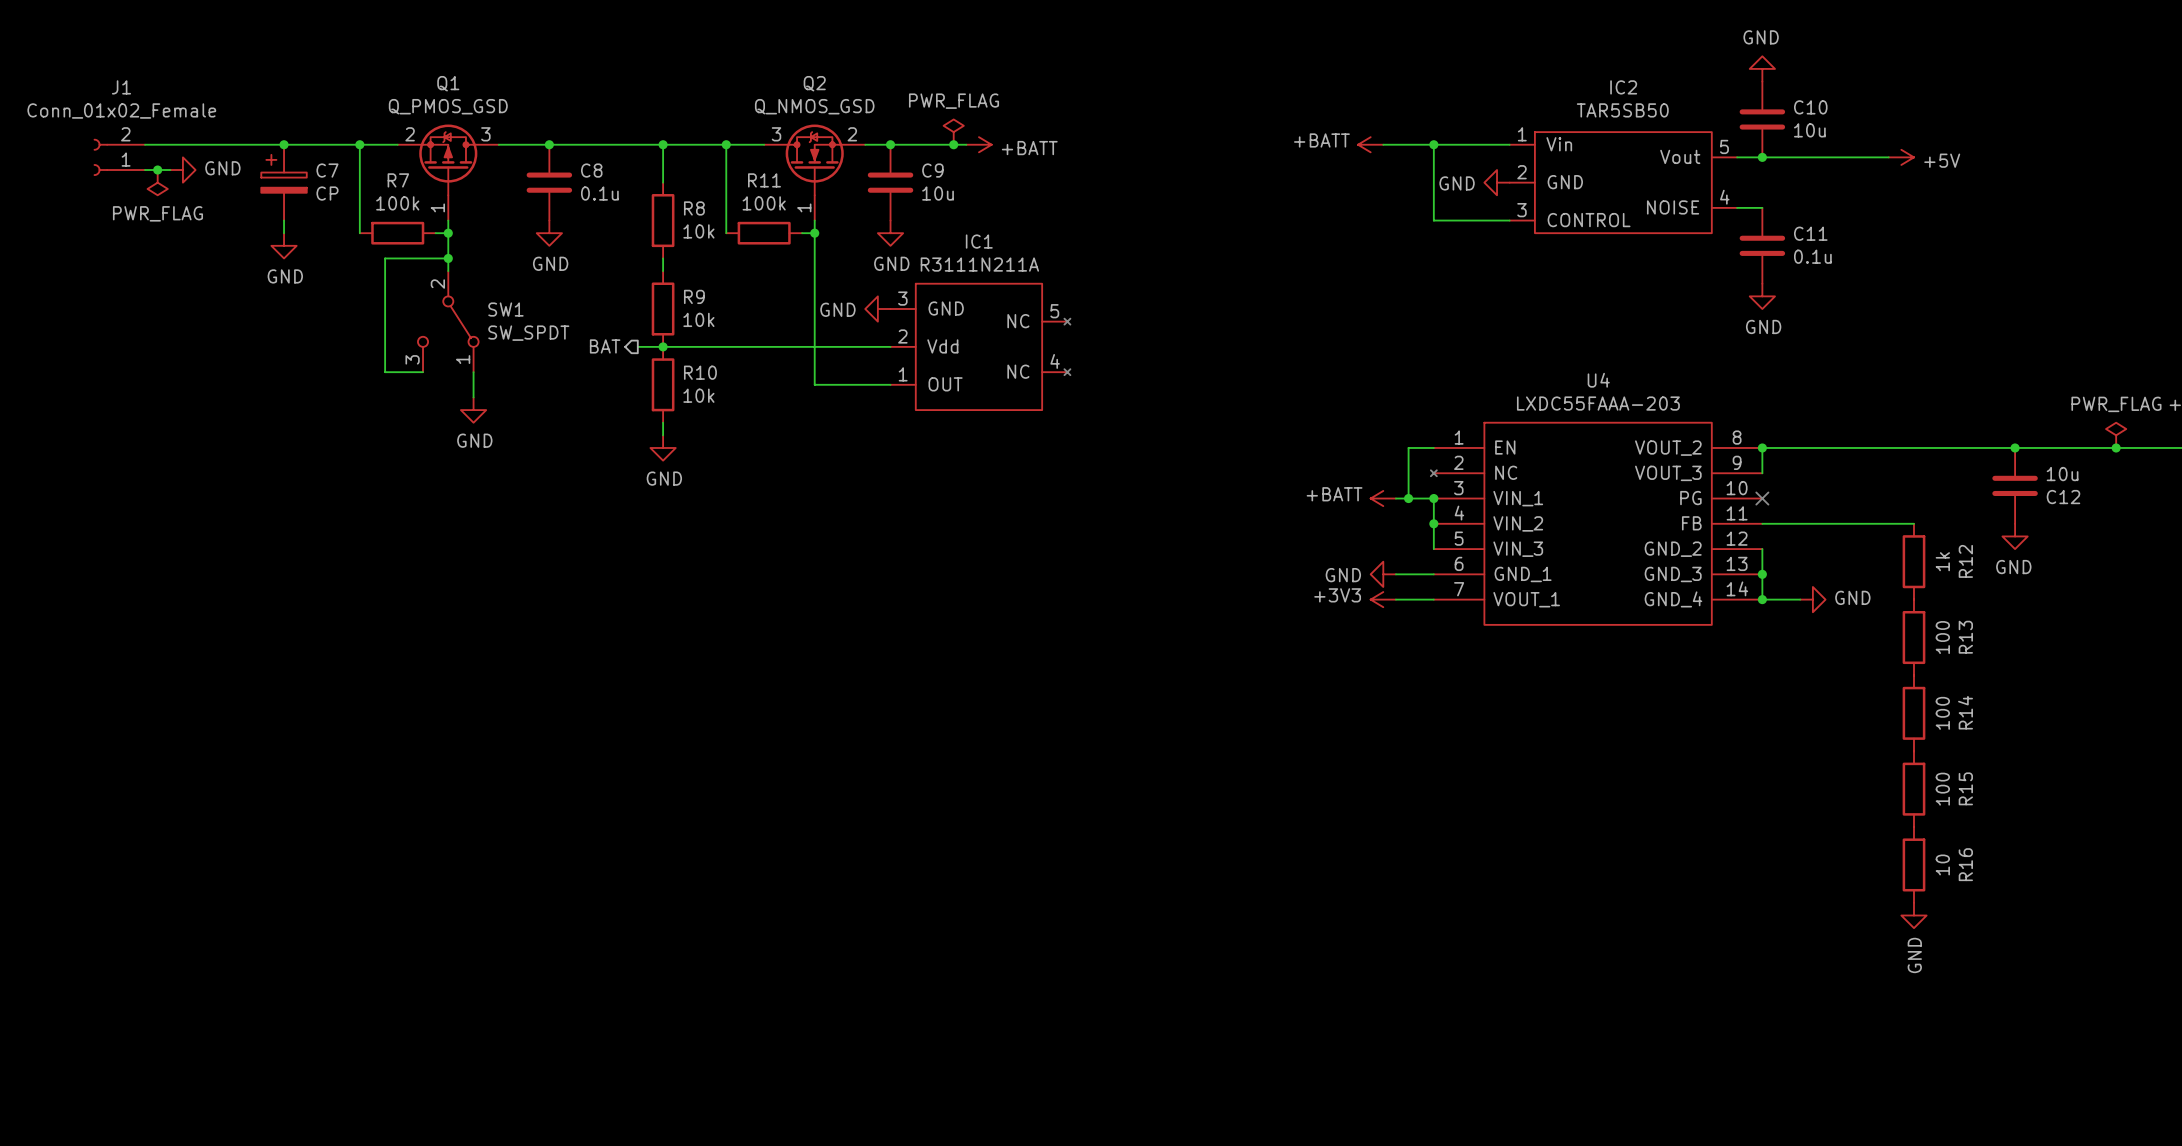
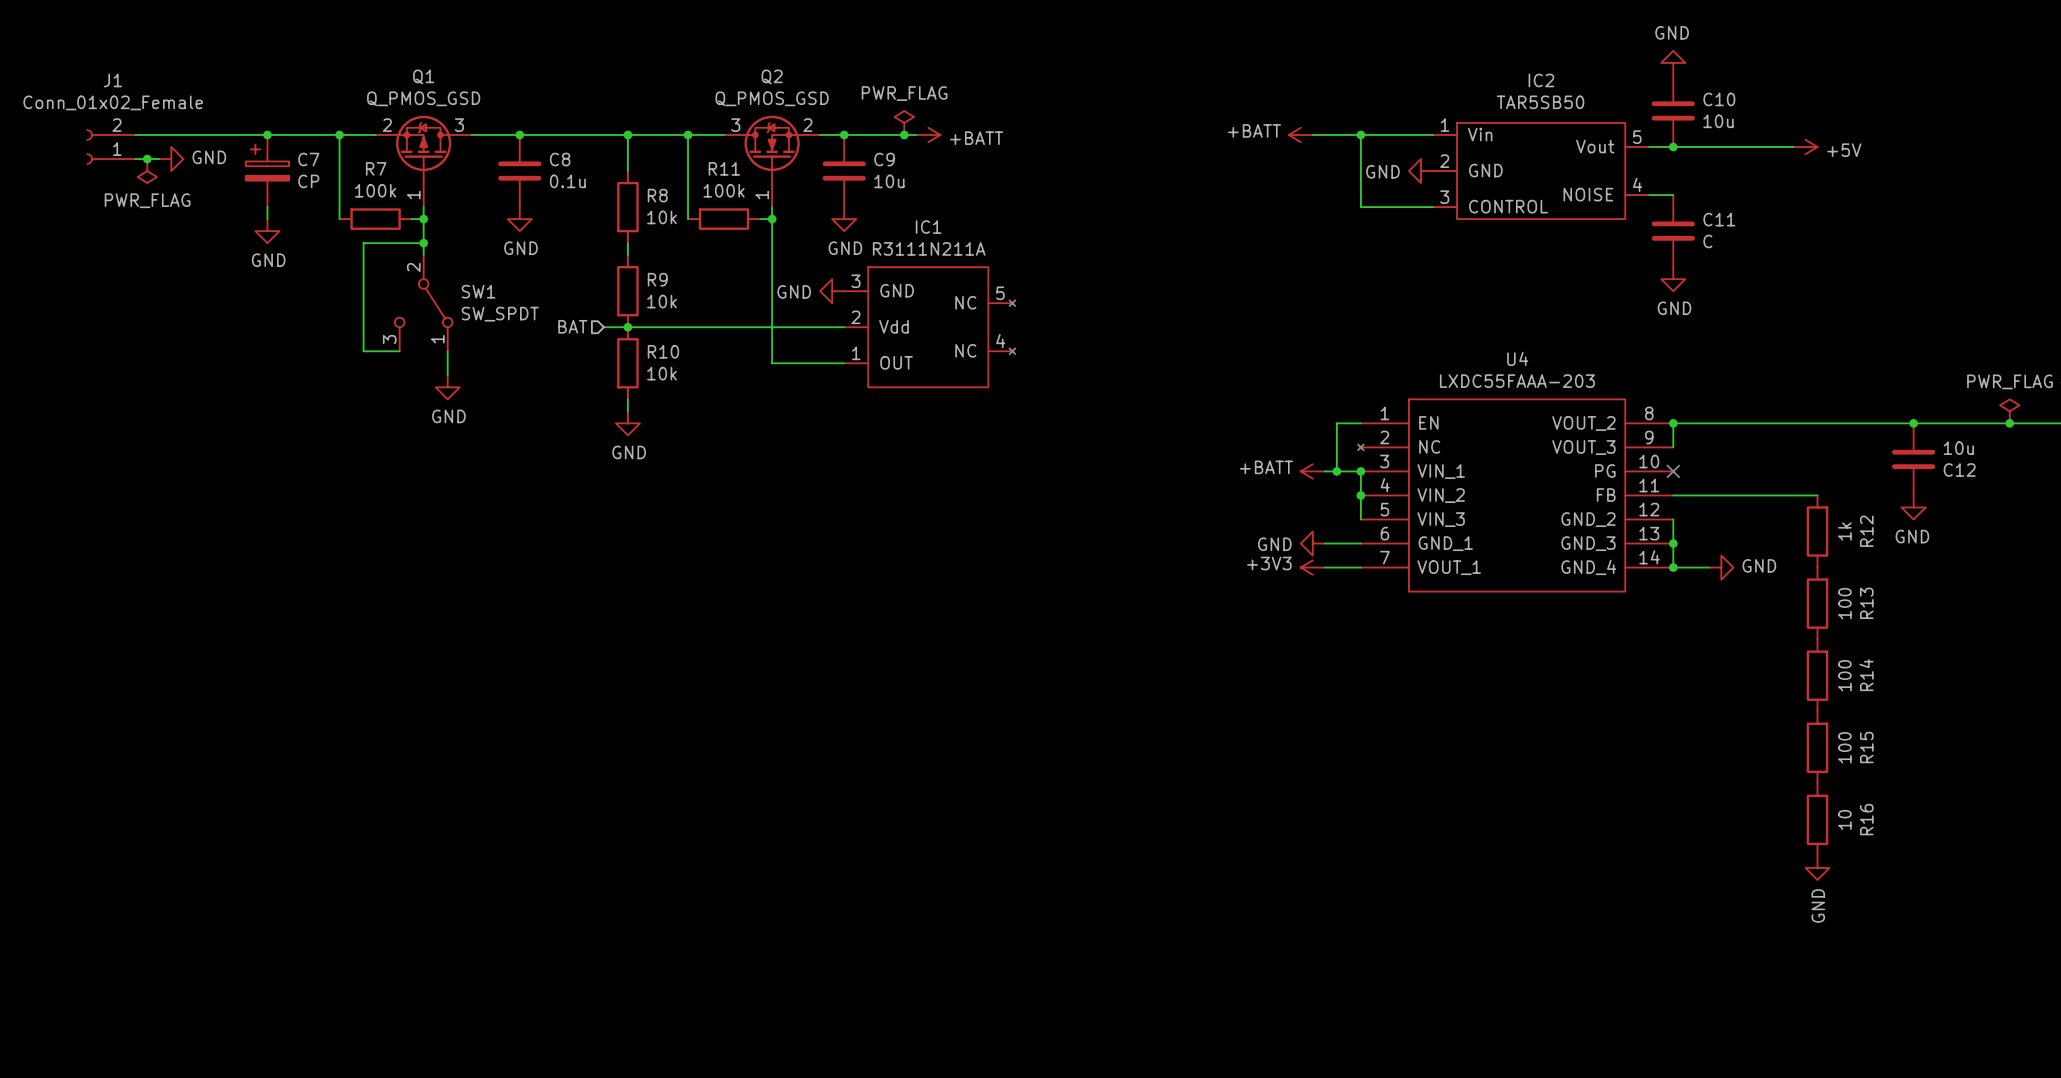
Q2 value: Q_NMOS_GSD (814, 106) -> Q_PMOS_GSD (772, 98)
C11 value: 0.1u (1812, 256) -> C (1707, 241)
hierarchical label shape: output (605, 346) -> input (572, 326)

